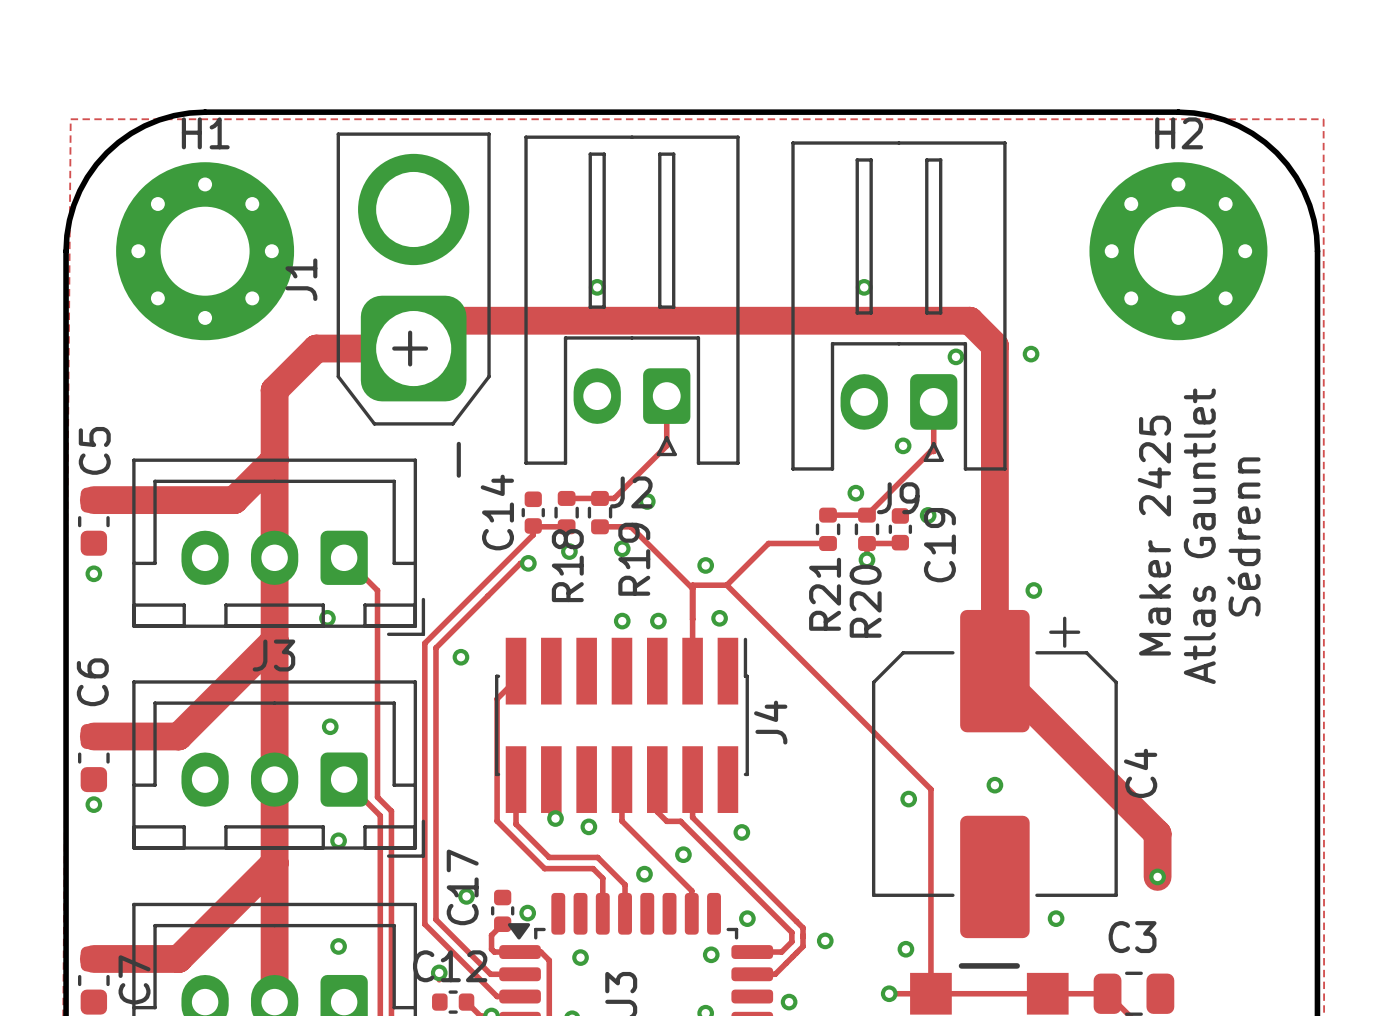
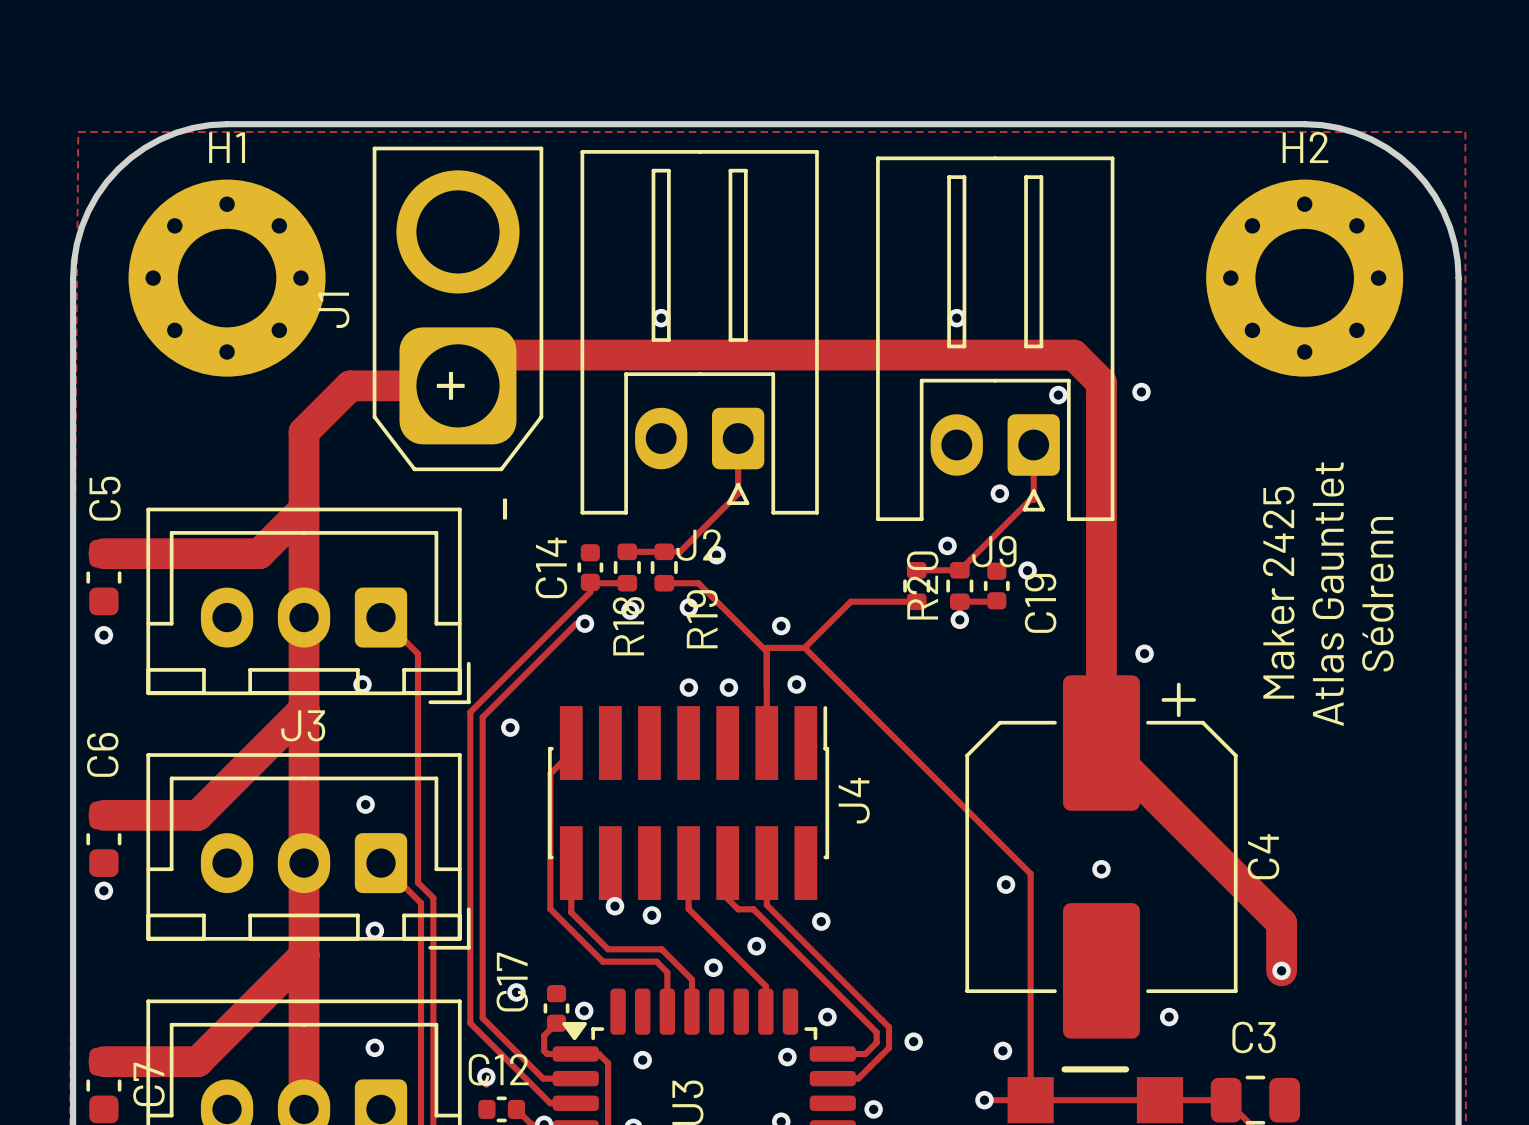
R21 name: R21 (825, 594) -> none
R20 name position: R20 (865, 601) -> R20 (922, 585)

